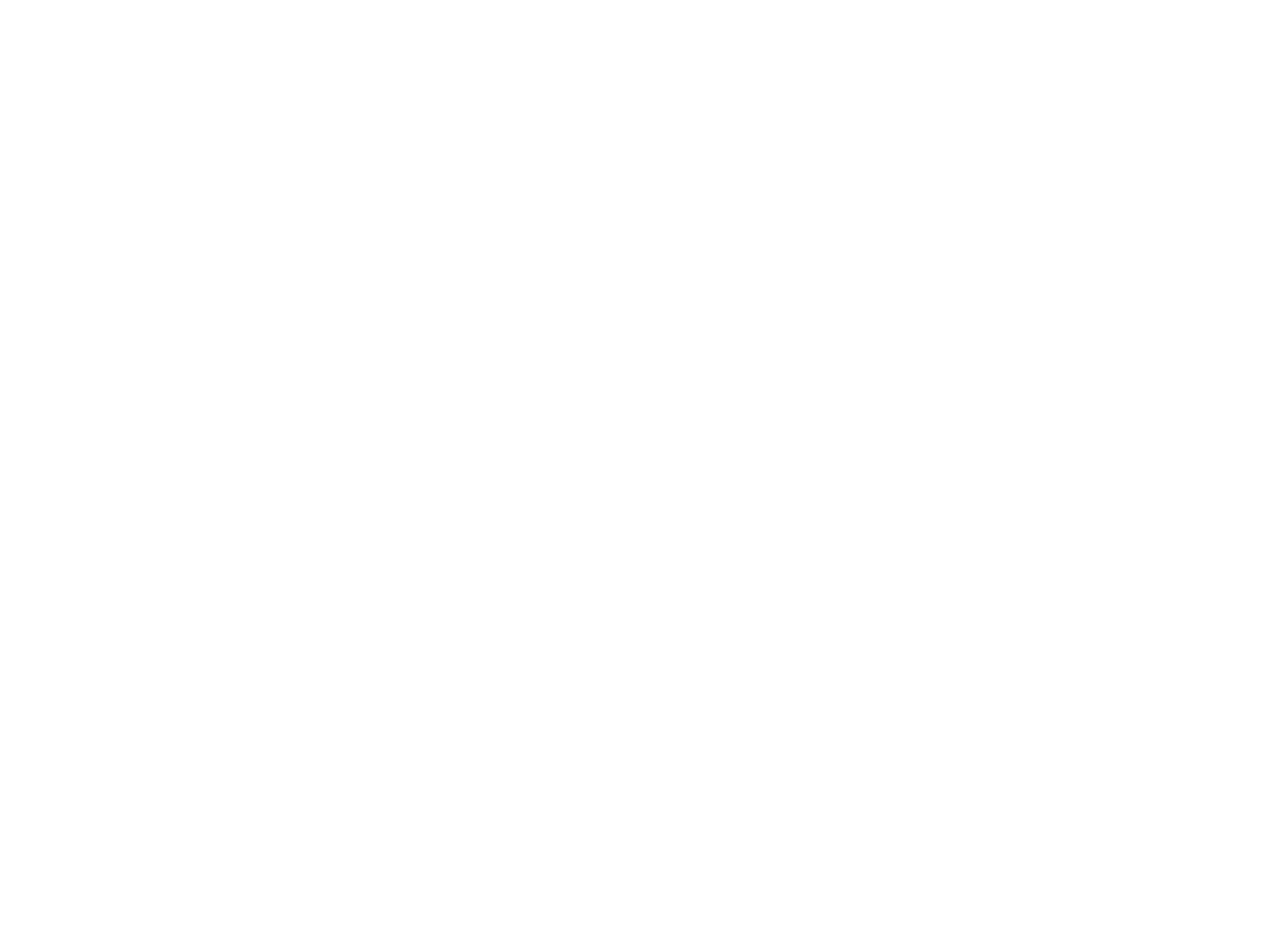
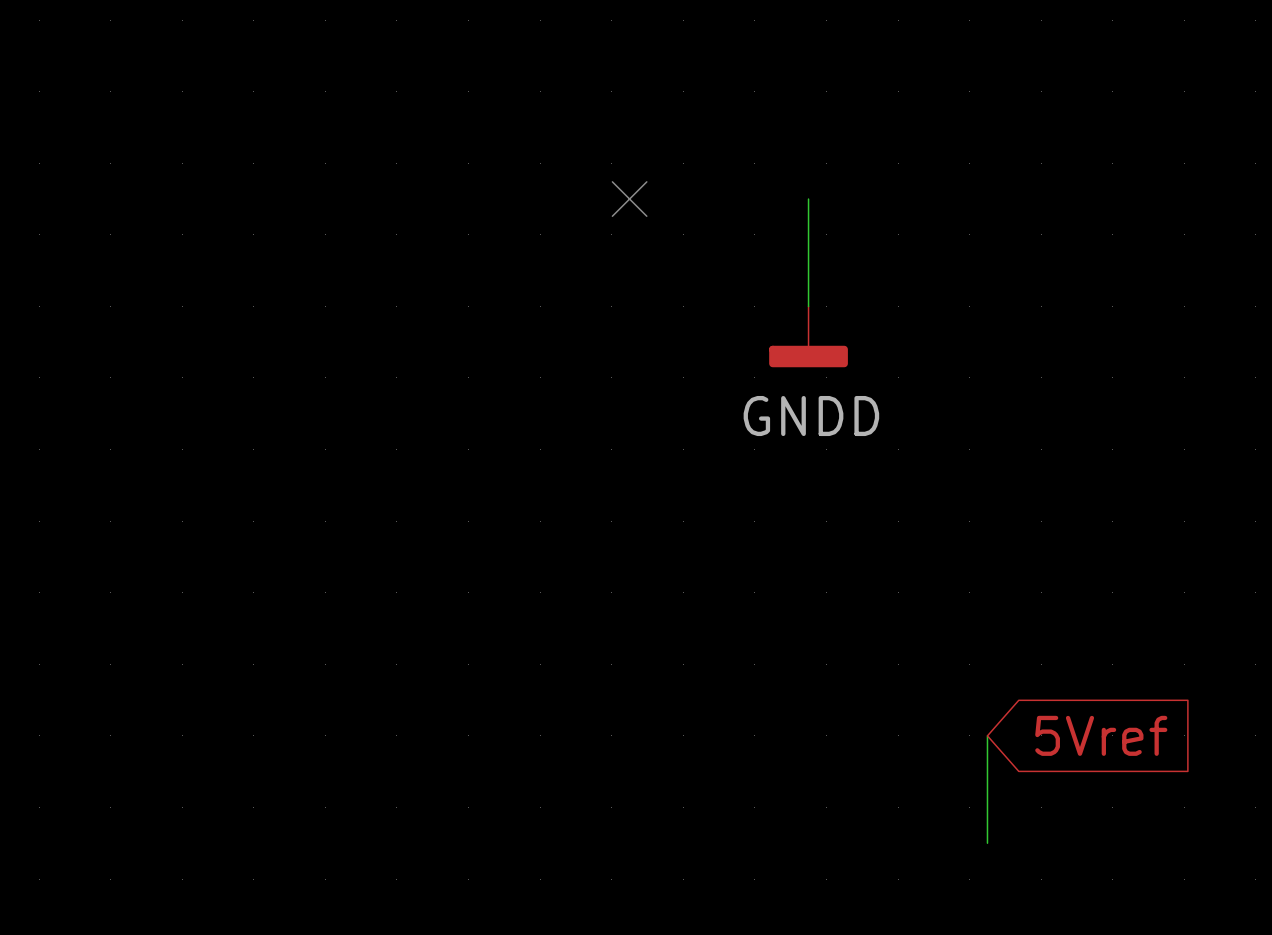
no-connect mark: none -> (629, 199)
wire: none -> (808, 199) (808, 306)
power symbol: none -> GNDD (808, 336)
wire: none -> (987, 735) (987, 843)
global label: none -> 5Vref (1101, 735)

